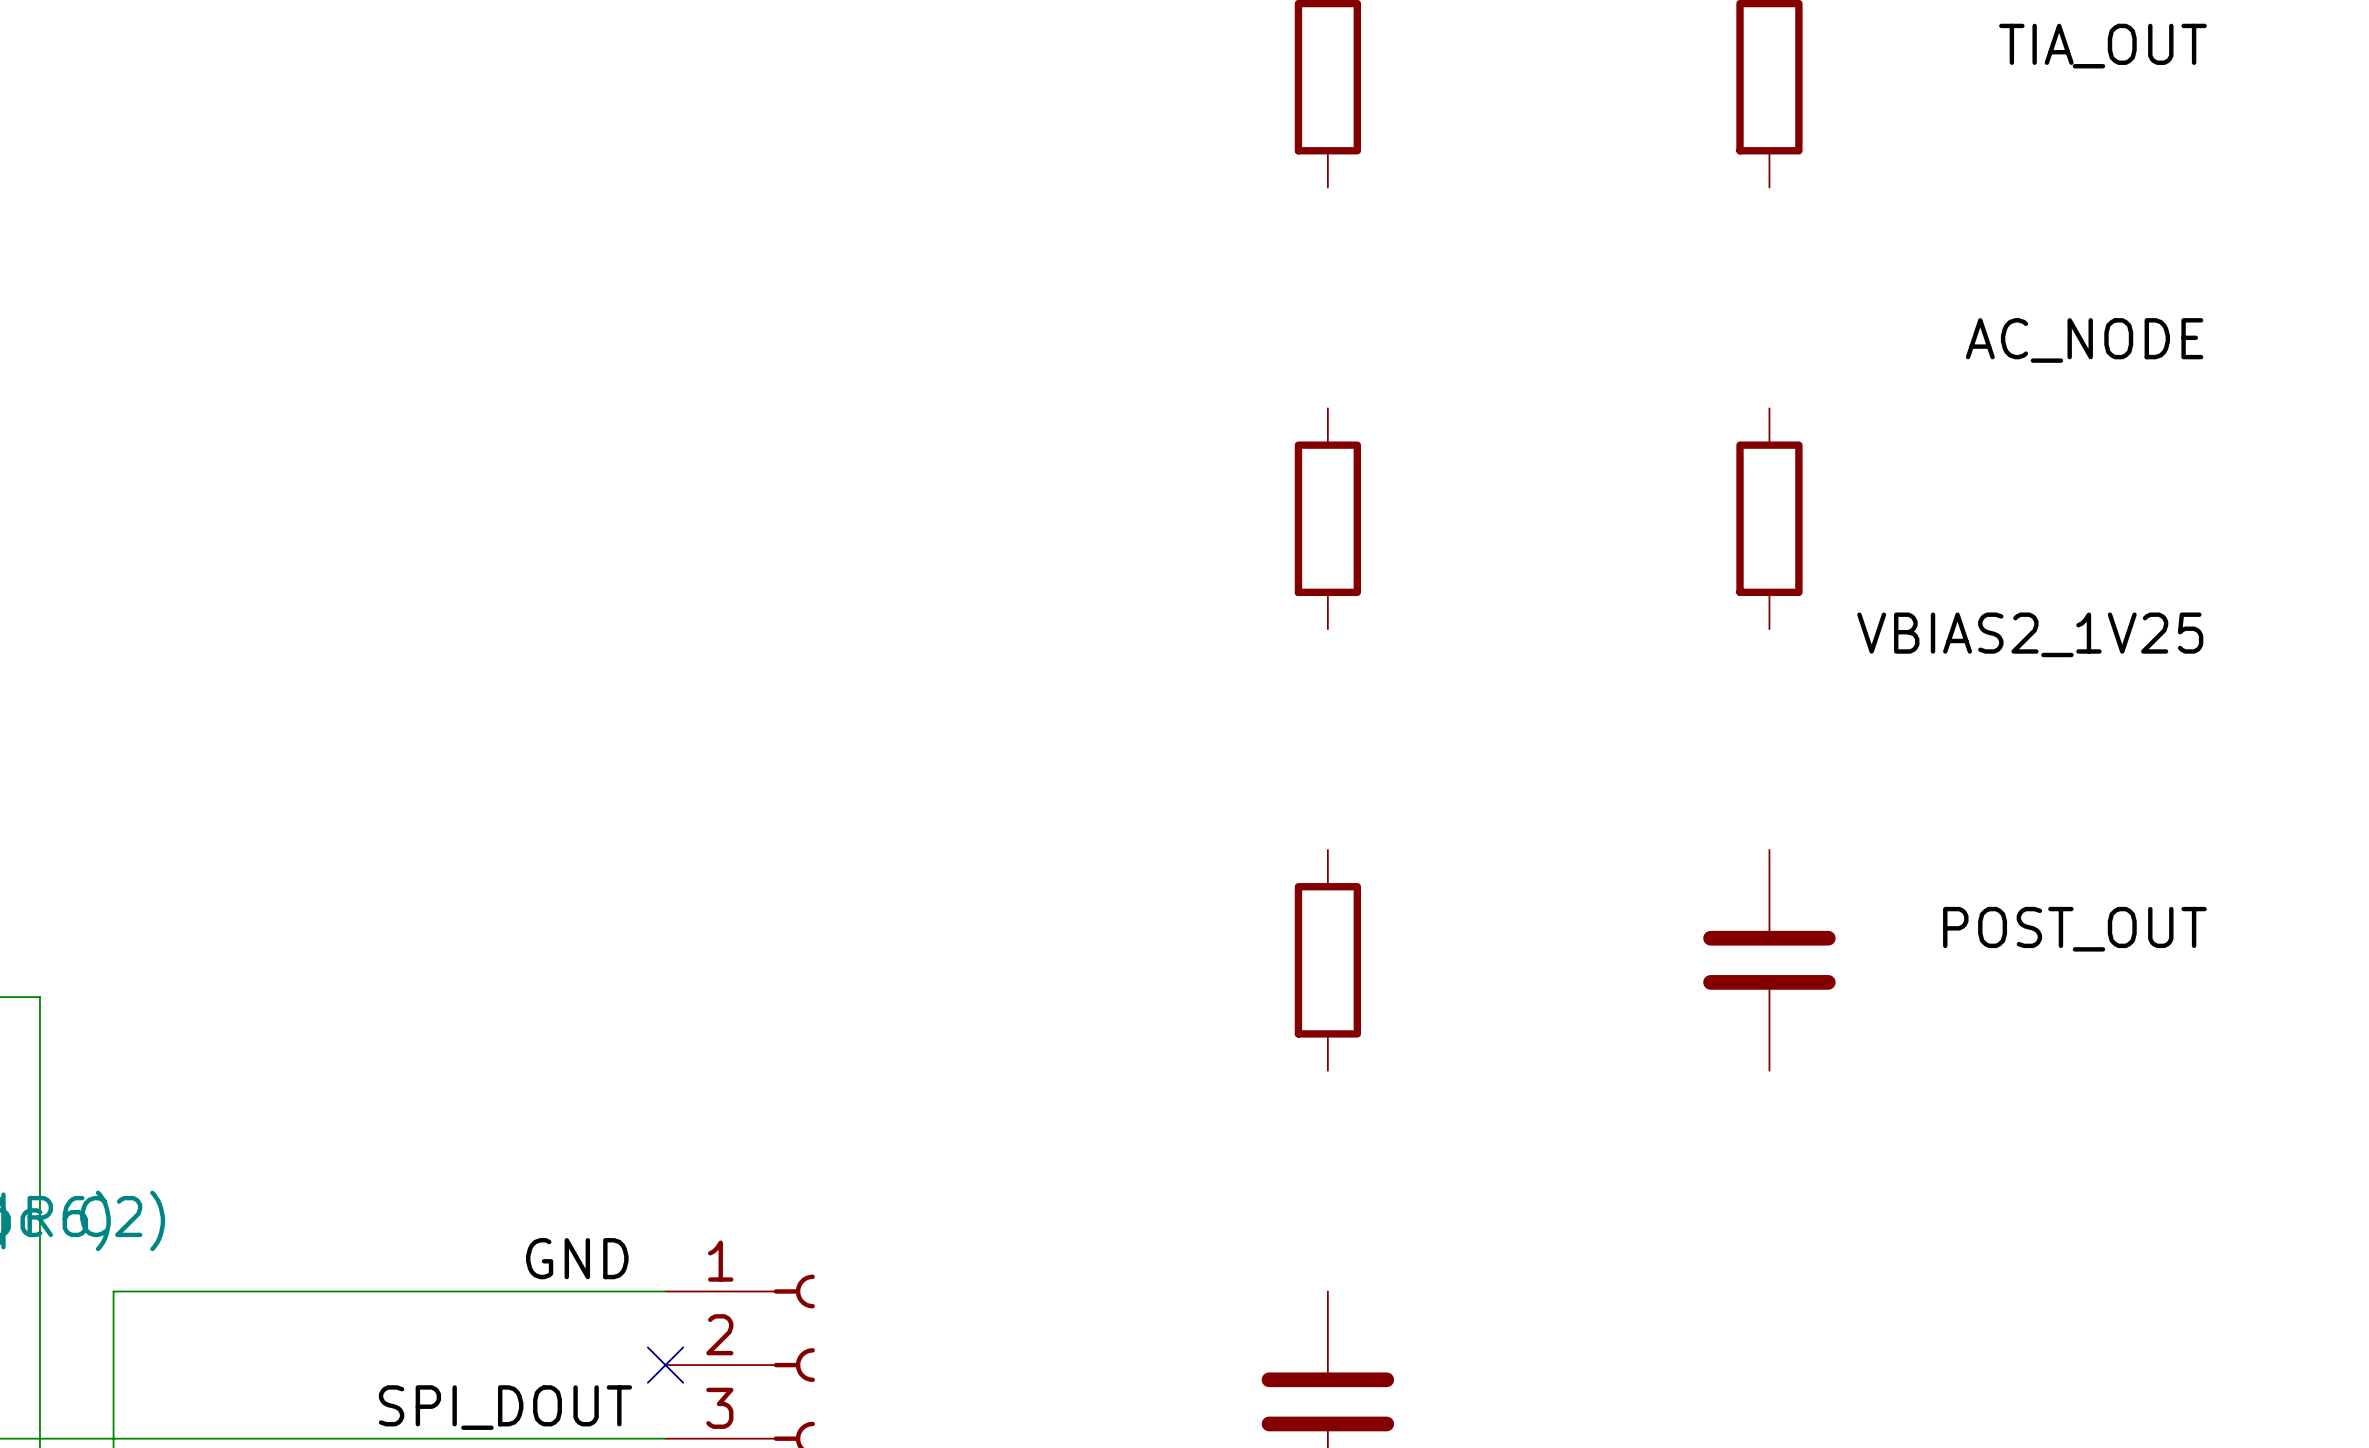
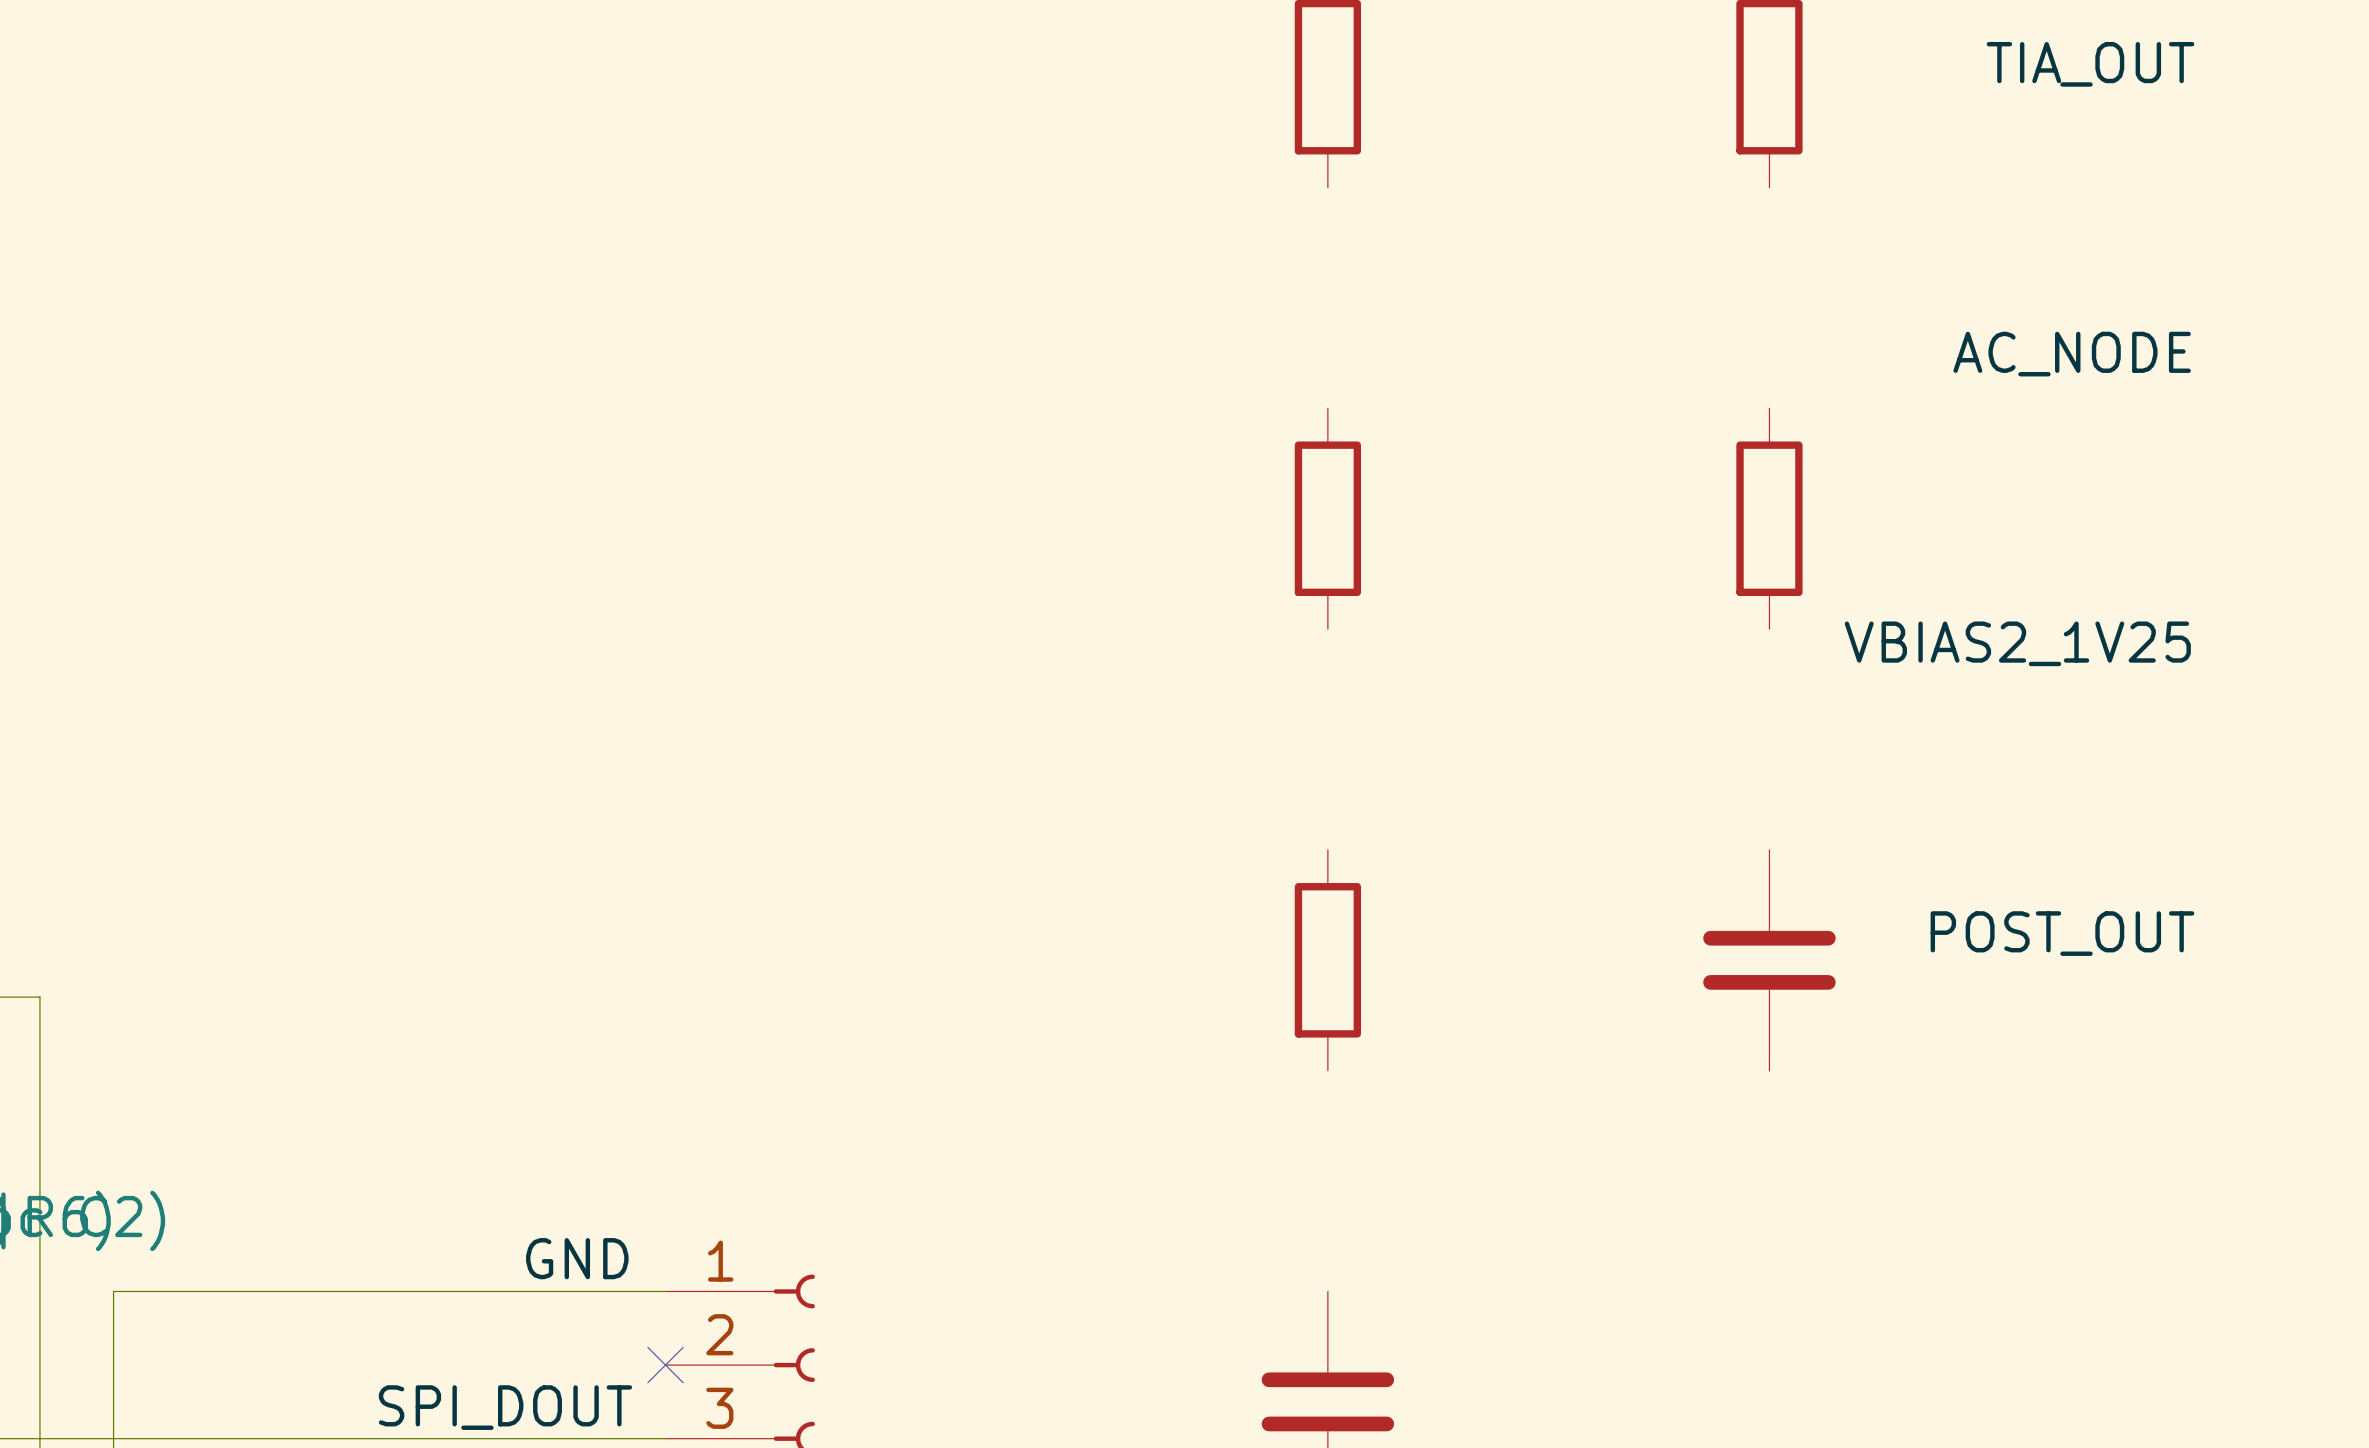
label position: TIA_OUT (2102, 46) -> TIA_OUT (2090, 64)
label position: AC_NODE (2084, 340) -> AC_NODE (2072, 354)
label position: VBIAS2_1V25 (2030, 634) -> VBIAS2_1V25 (2017, 643)
label position: POST_OUT (2074, 929) -> POST_OUT (2062, 933)

